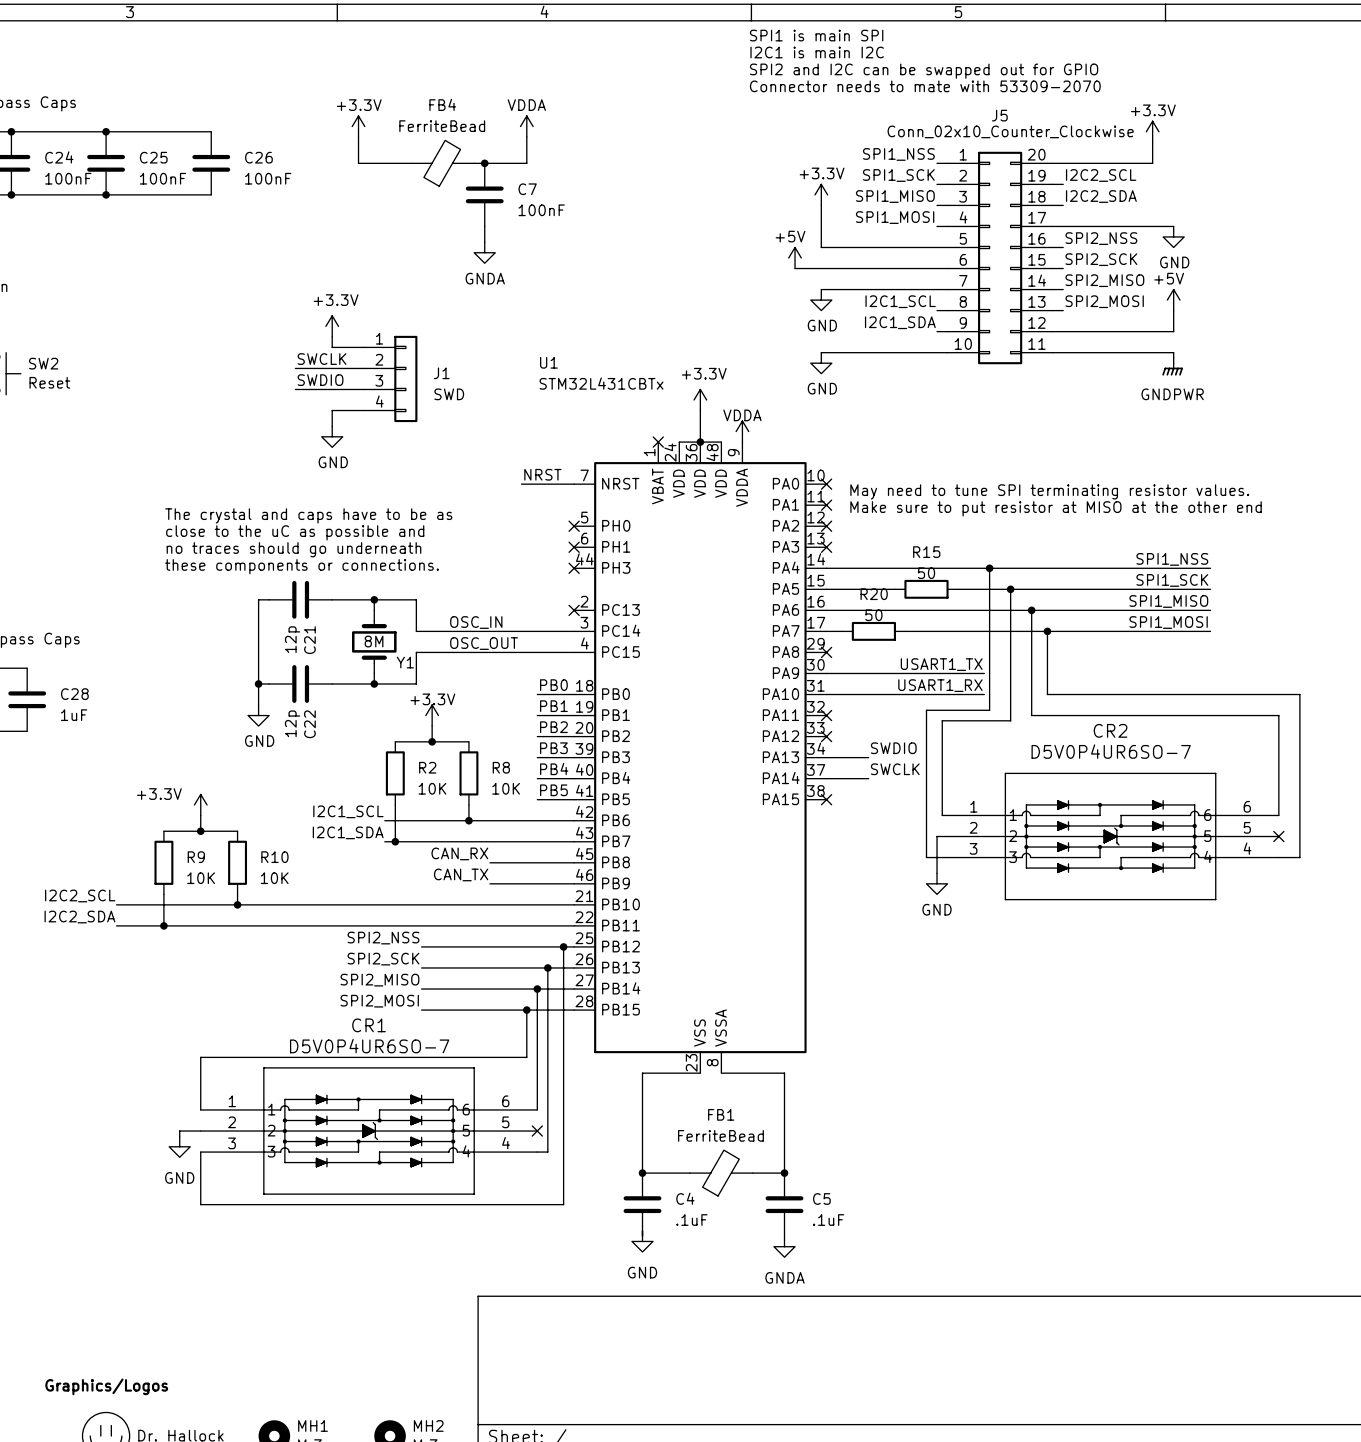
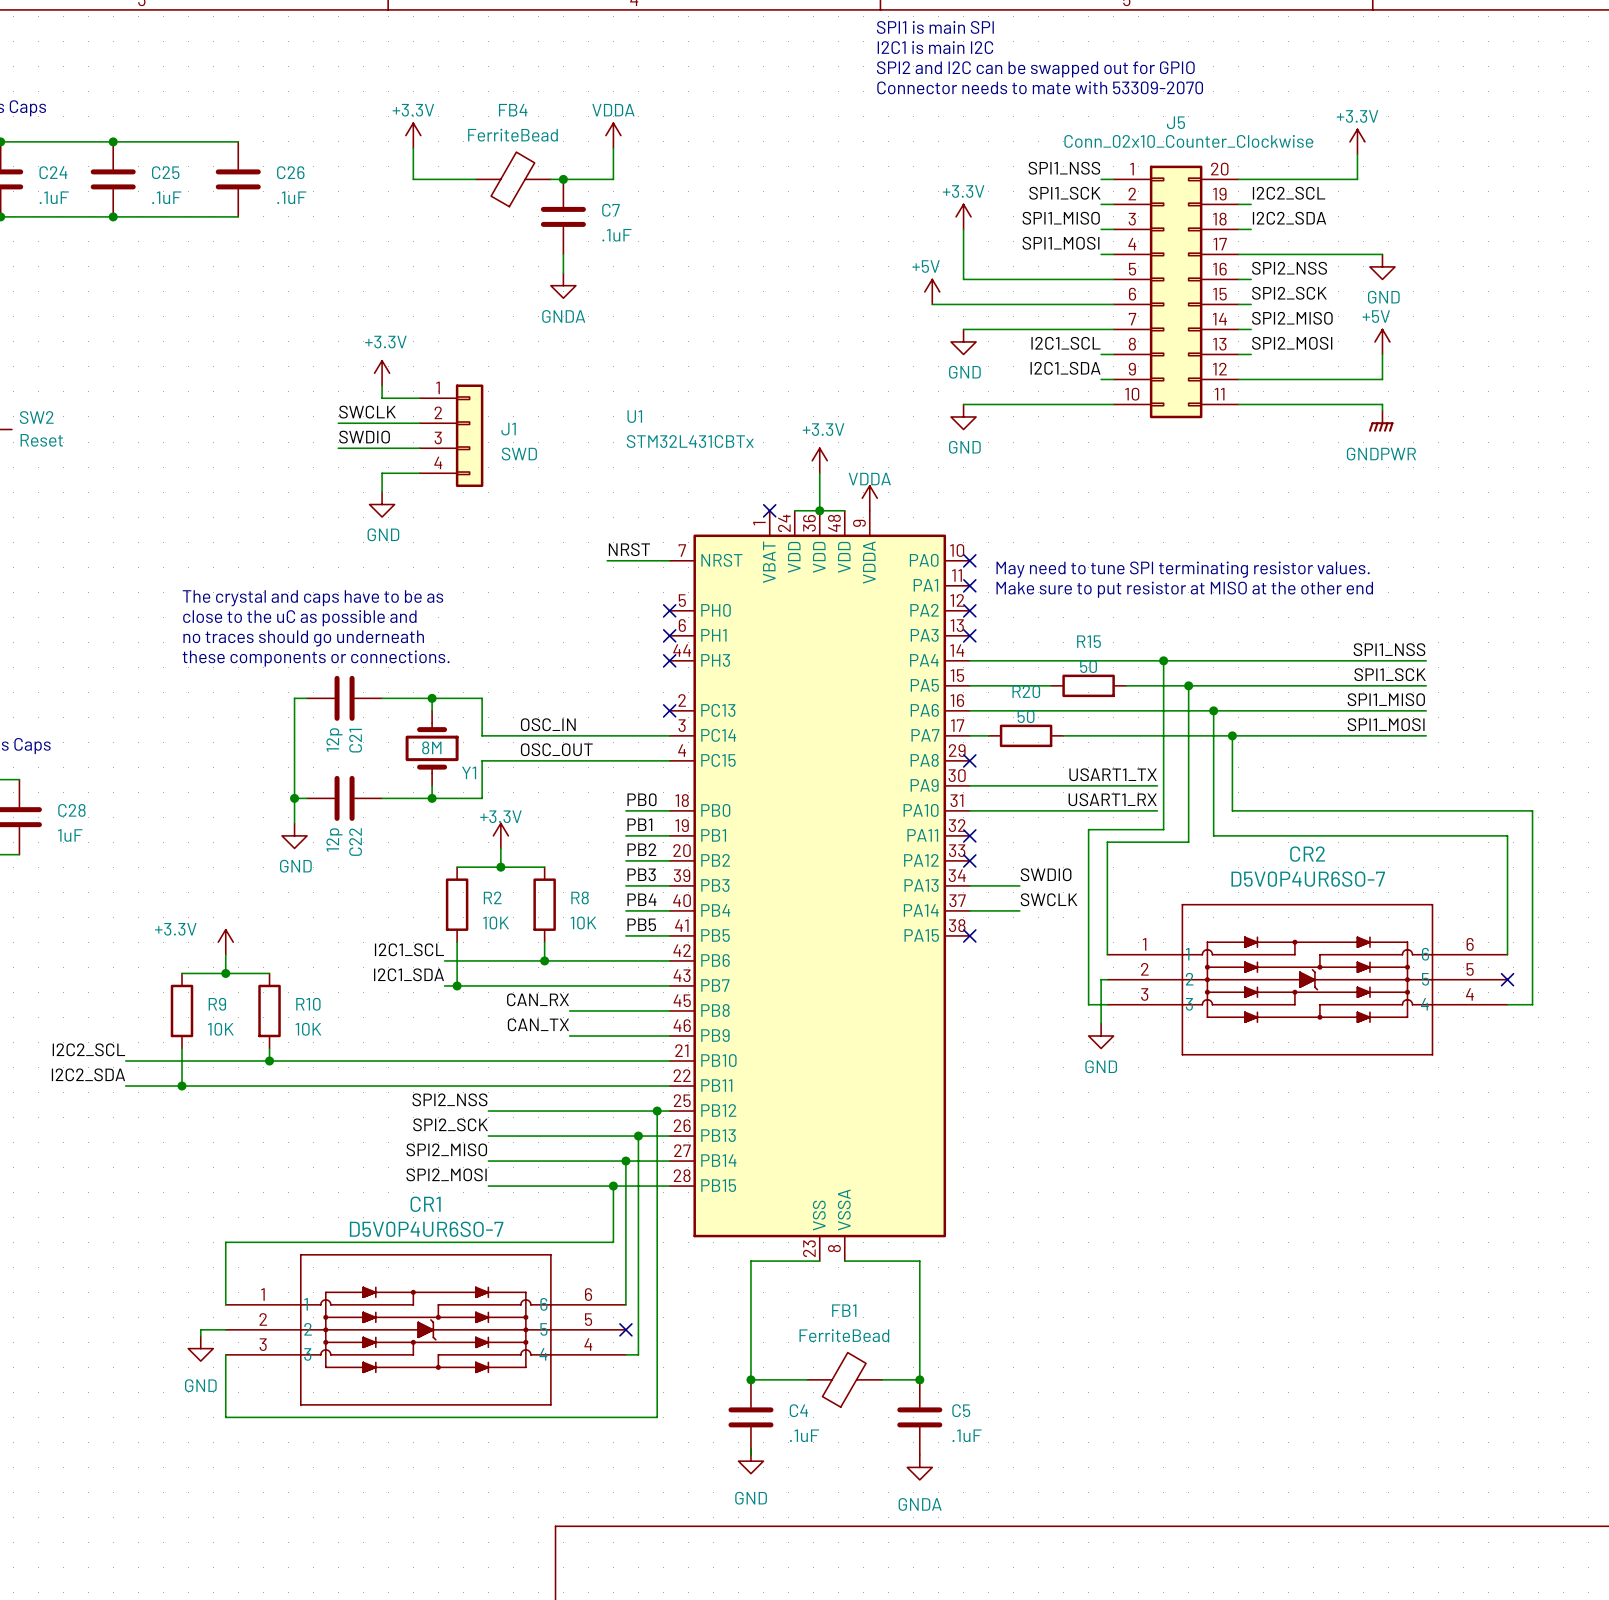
C24 value: 100nF (68, 178) -> .1uF (54, 197)
C25 value: 100nF (163, 178) -> .1uF (166, 197)
C26 value: 100nF (268, 178) -> .1uF (291, 197)
C7 value: 100nF (541, 210) -> .1uF (616, 235)

